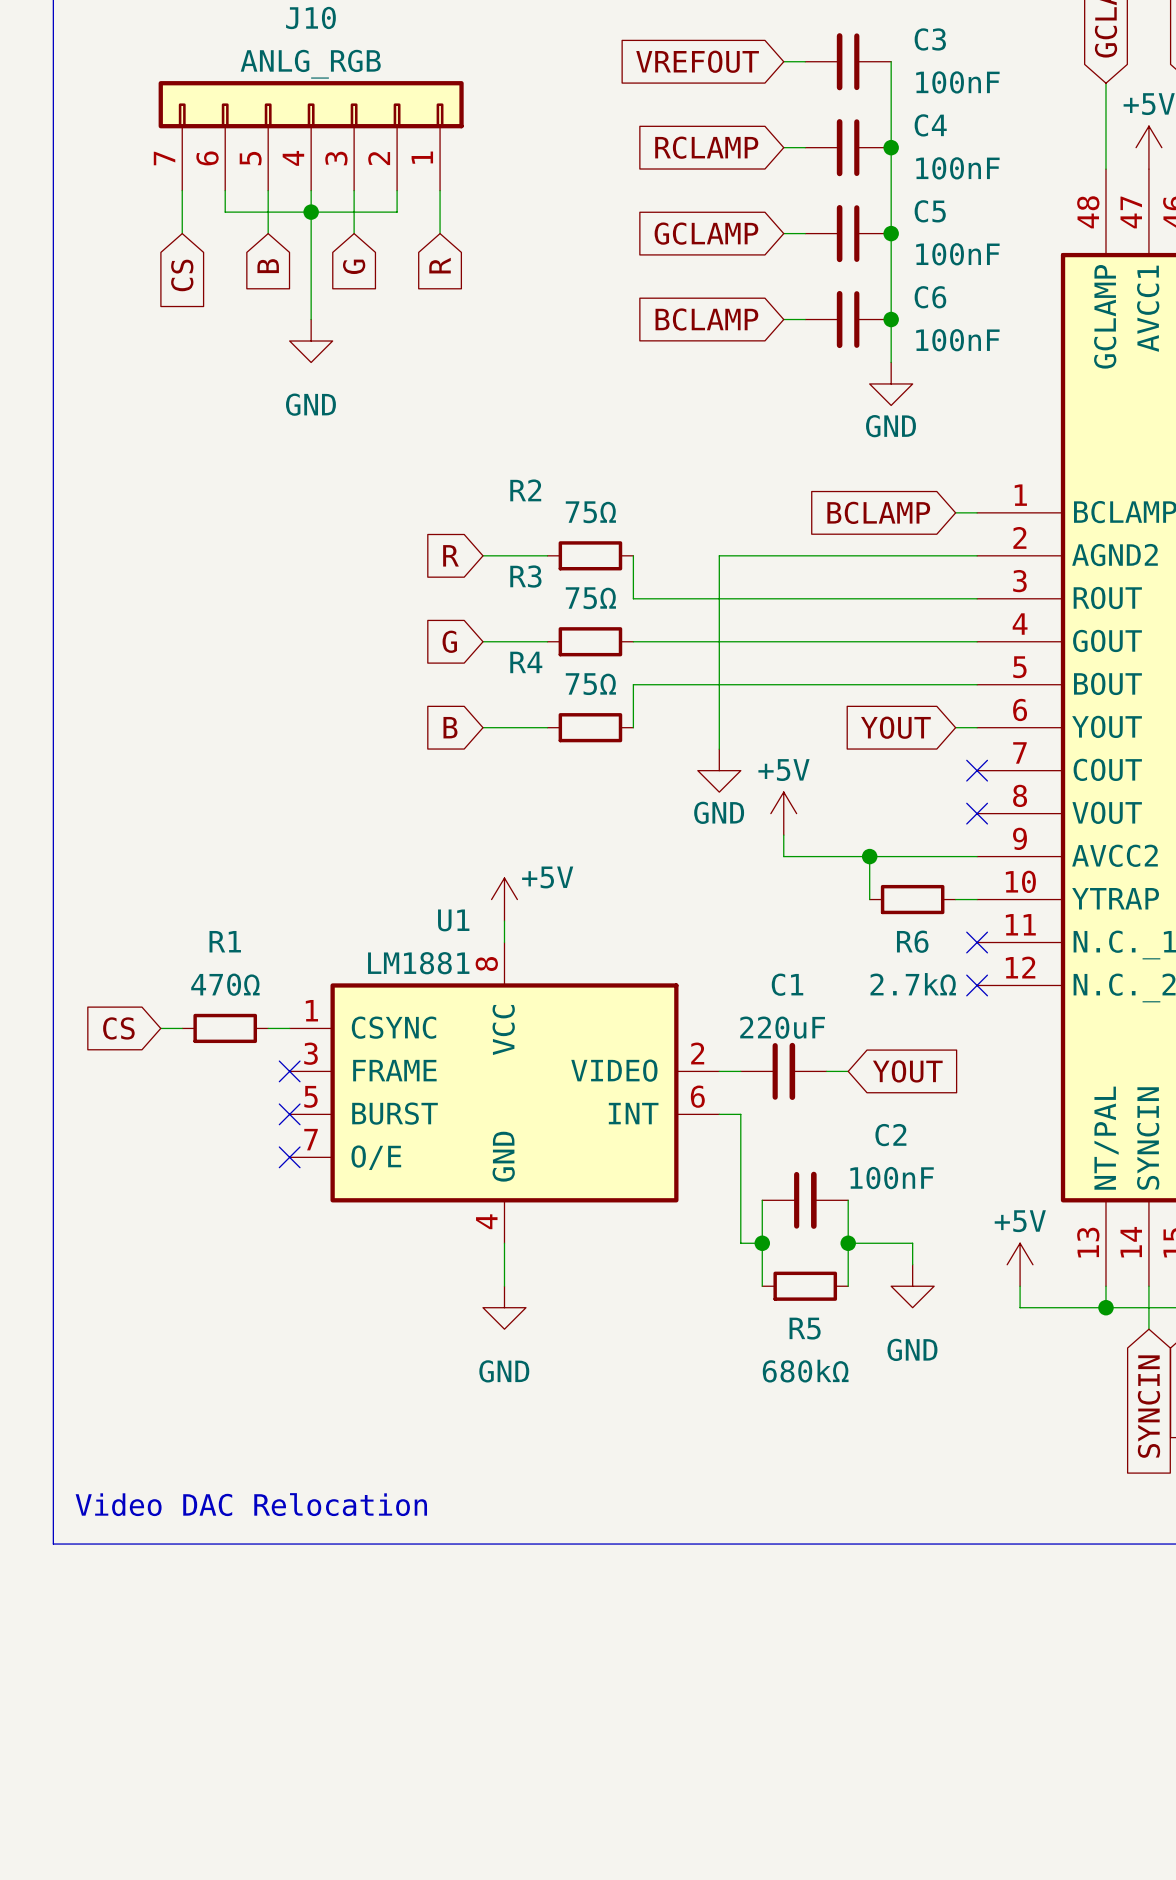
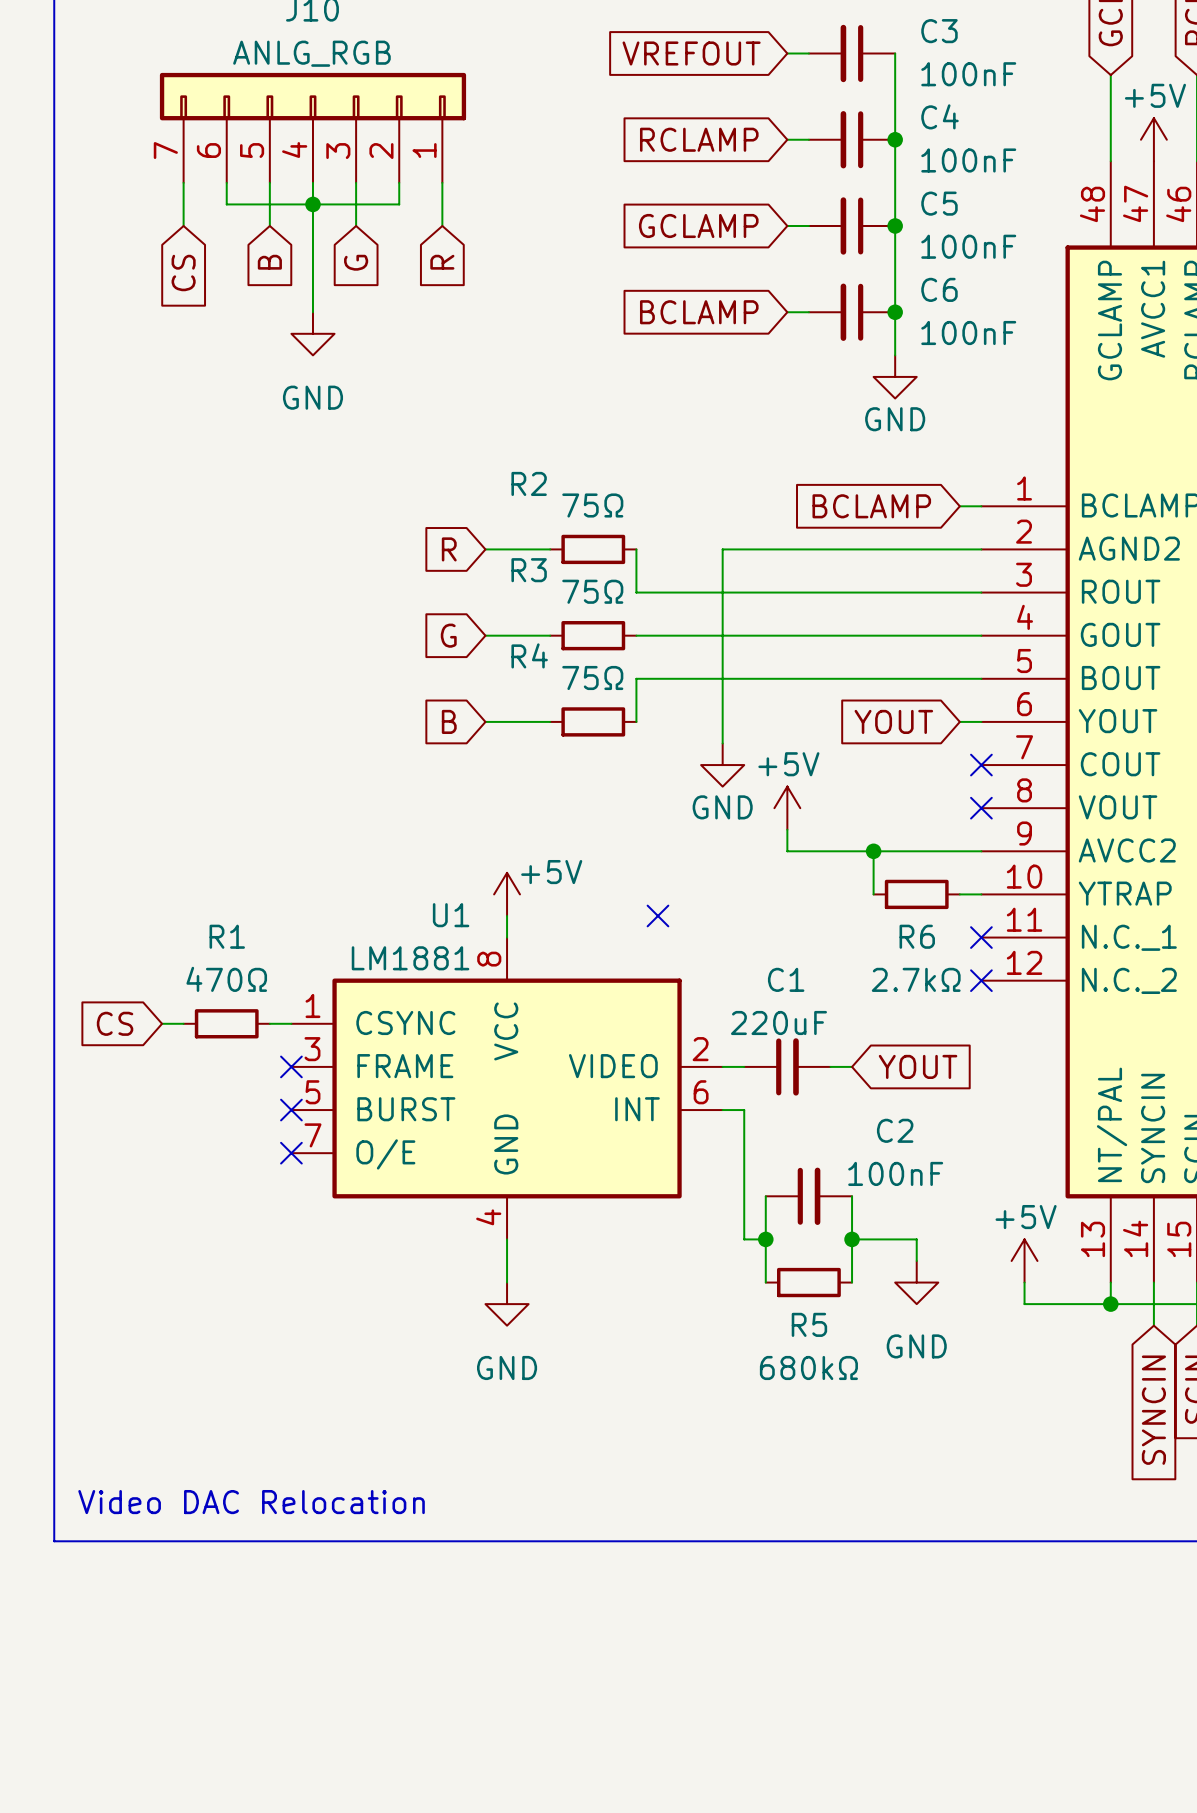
no-connect mark: none -> (657, 915)

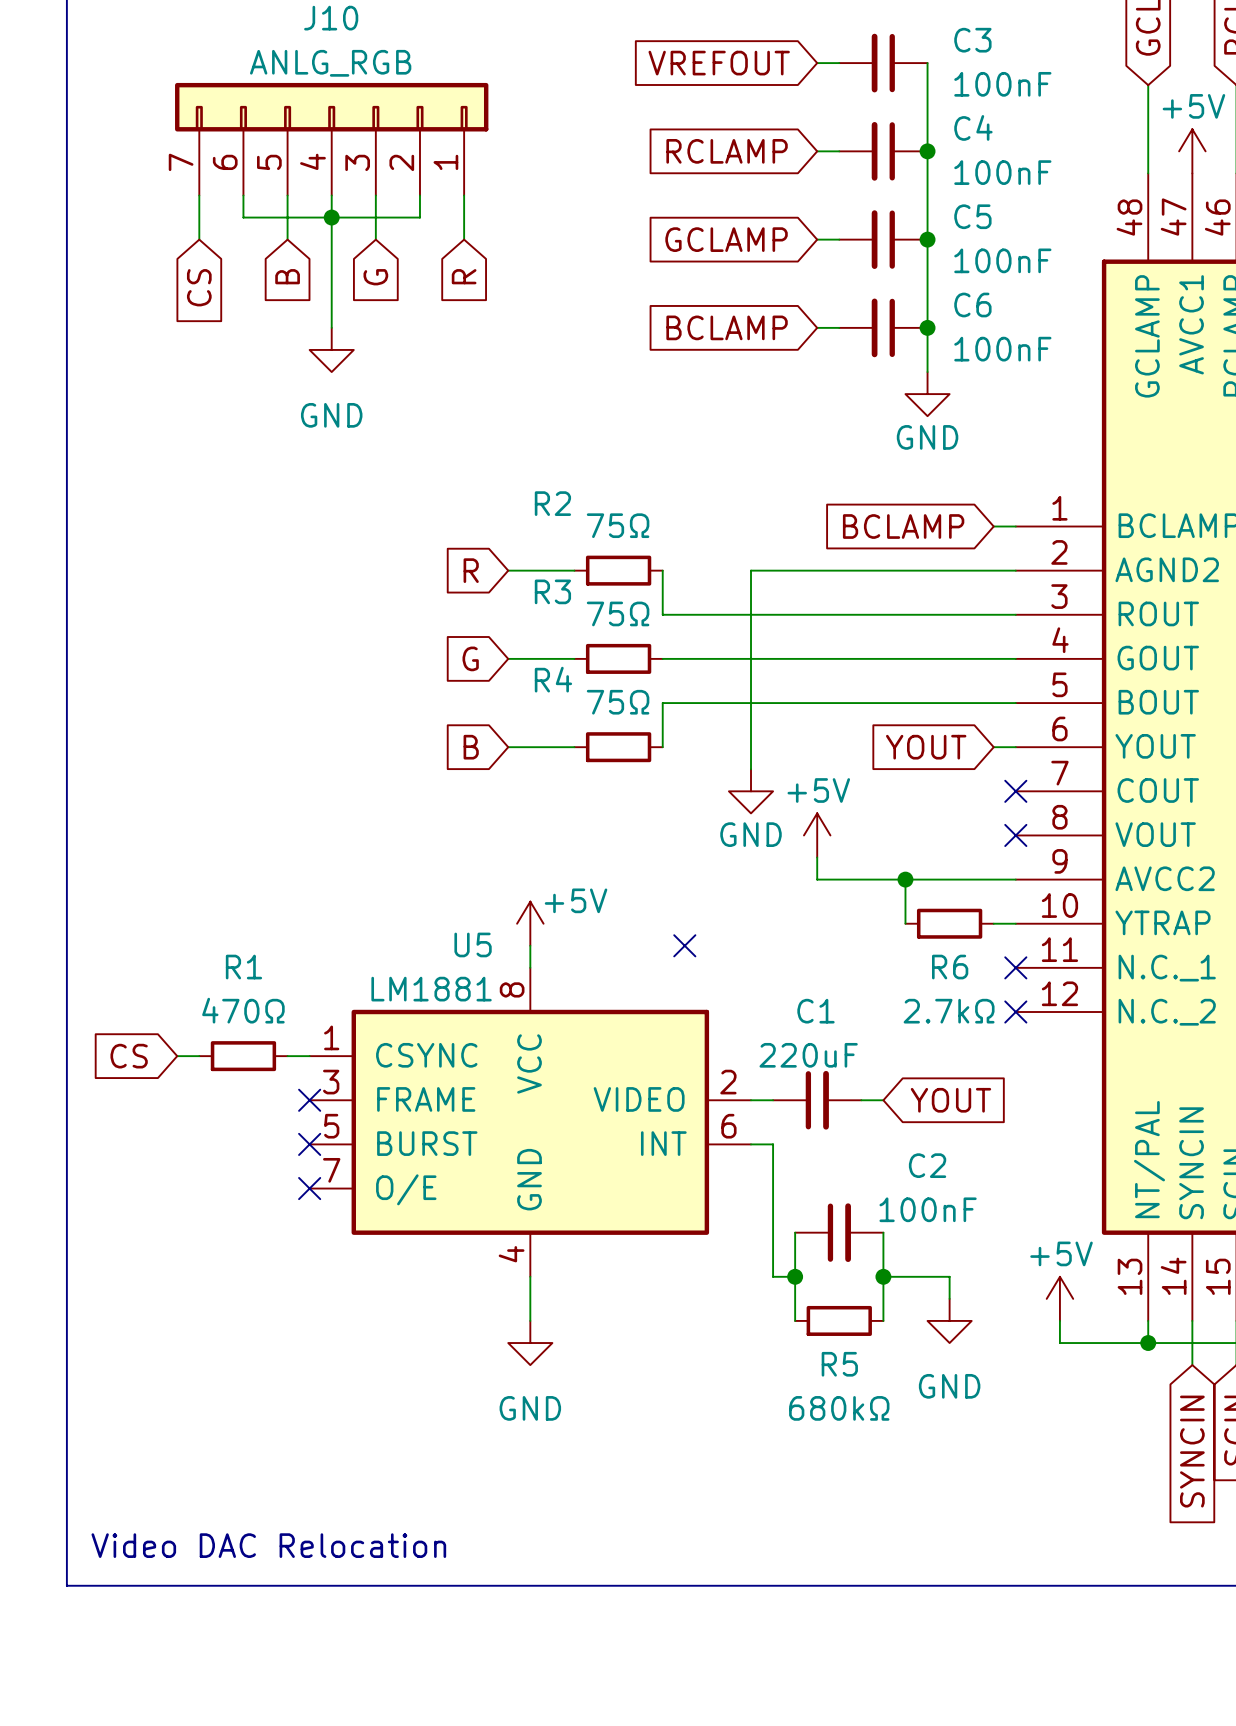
U1 name: U1 (451, 915) -> U5 (473, 944)

